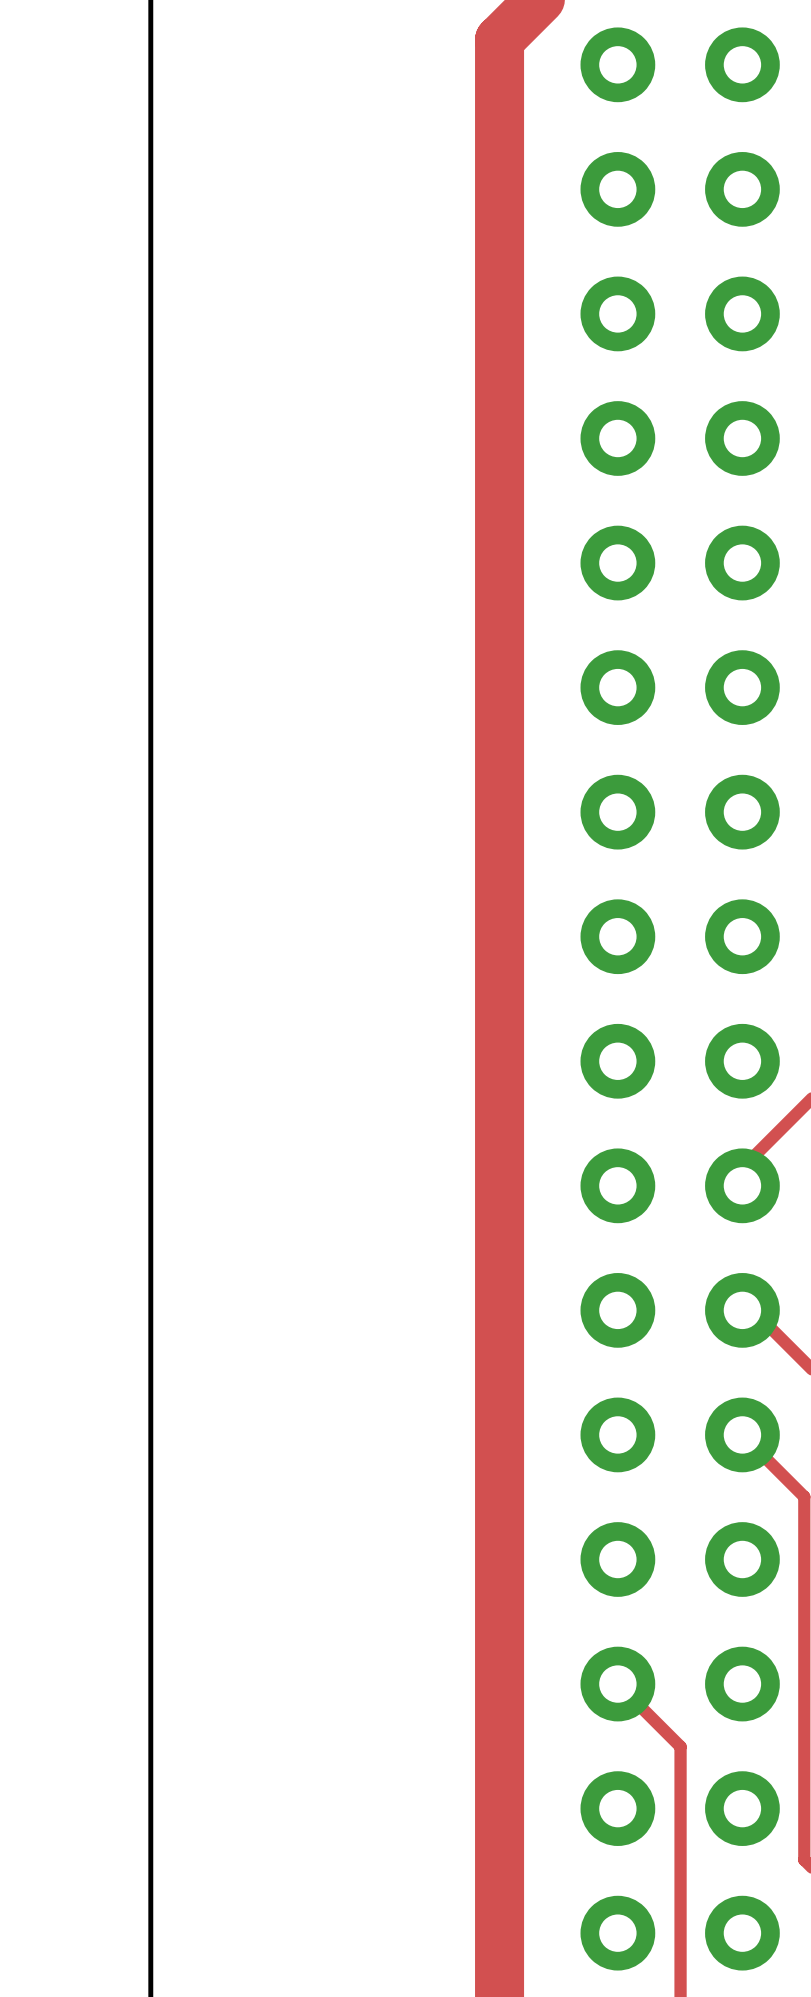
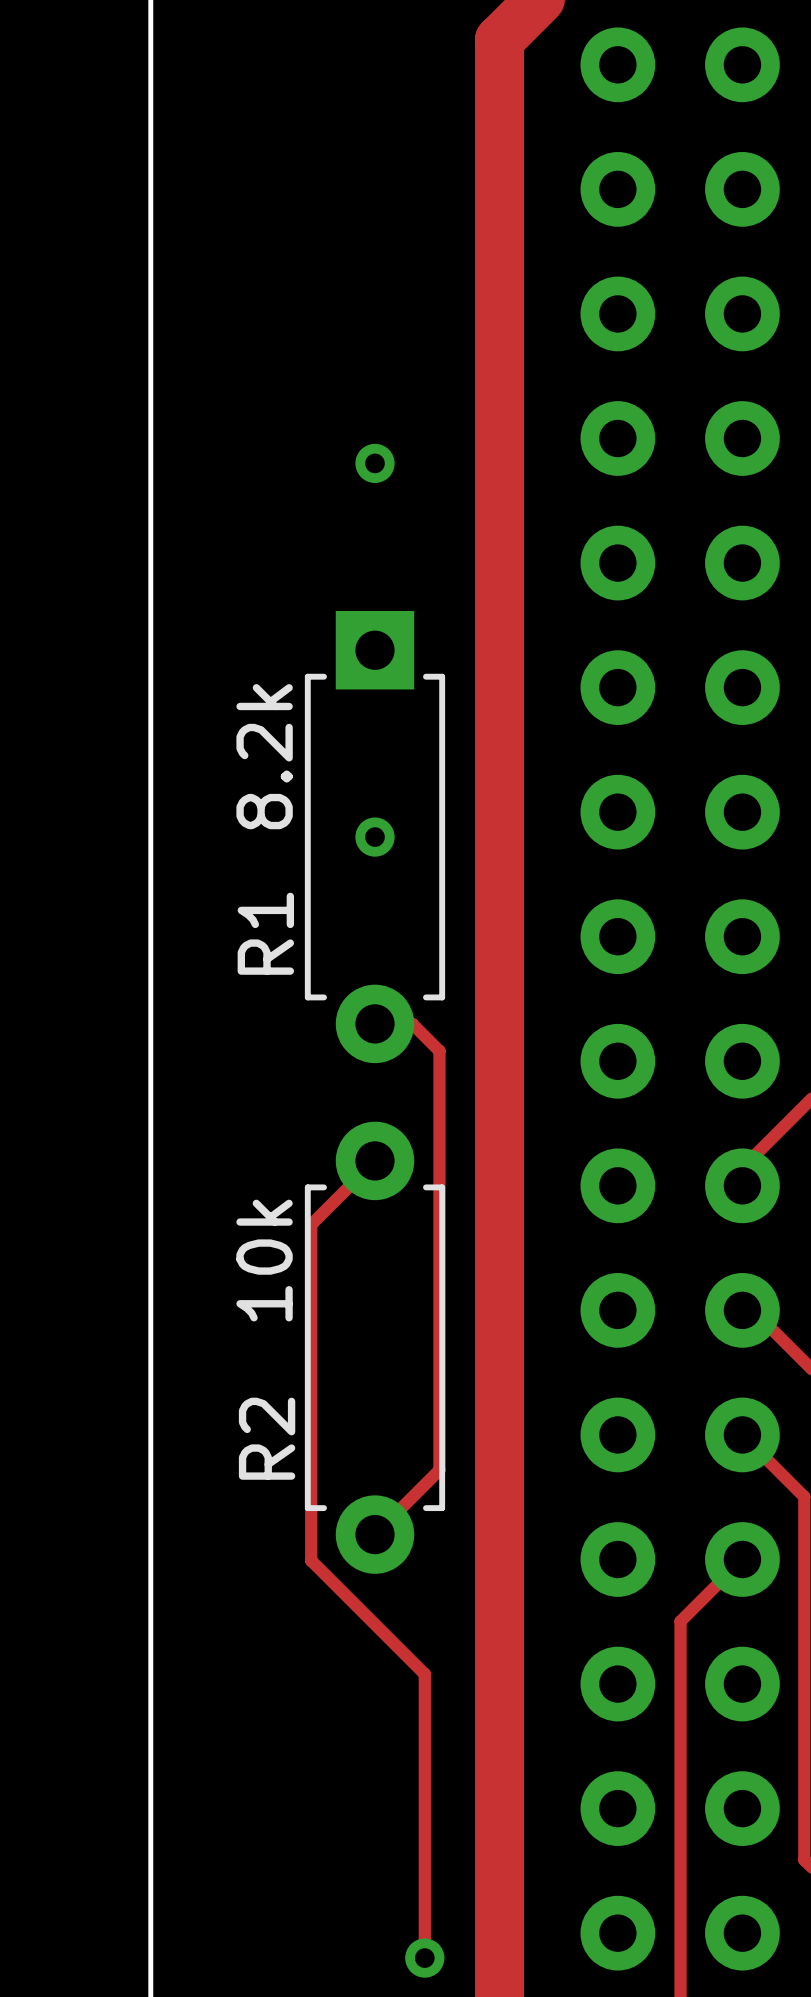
via: none -> (374, 463)
R1: none -> 8.2k (374, 837)
via: none -> (374, 837)
track: none -> (374, 1023) (412, 1023) (439, 1051) (439, 1470) (374, 1534)
track: none -> (374, 1160) (311, 1224) (311, 1560) (424, 1674) (424, 1958)
R2: none -> 10k (374, 1347)
track: (617, 1684) (680, 1746) -> (742, 1559) (680, 1621) (680, 1746)
via: none -> (424, 1958)

